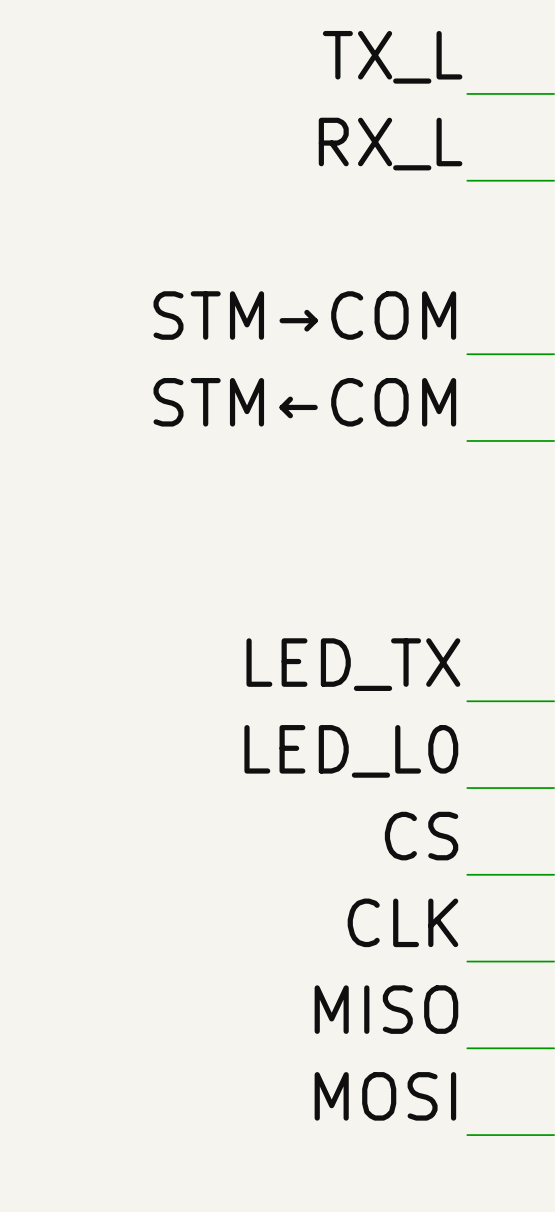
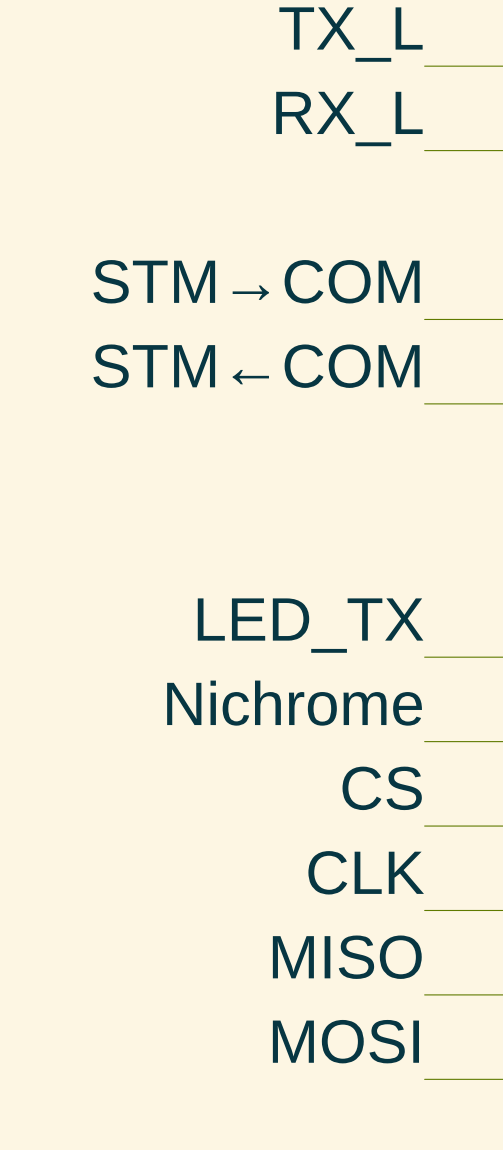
label: LED_L0 (351, 751) -> Nichrome (294, 703)

